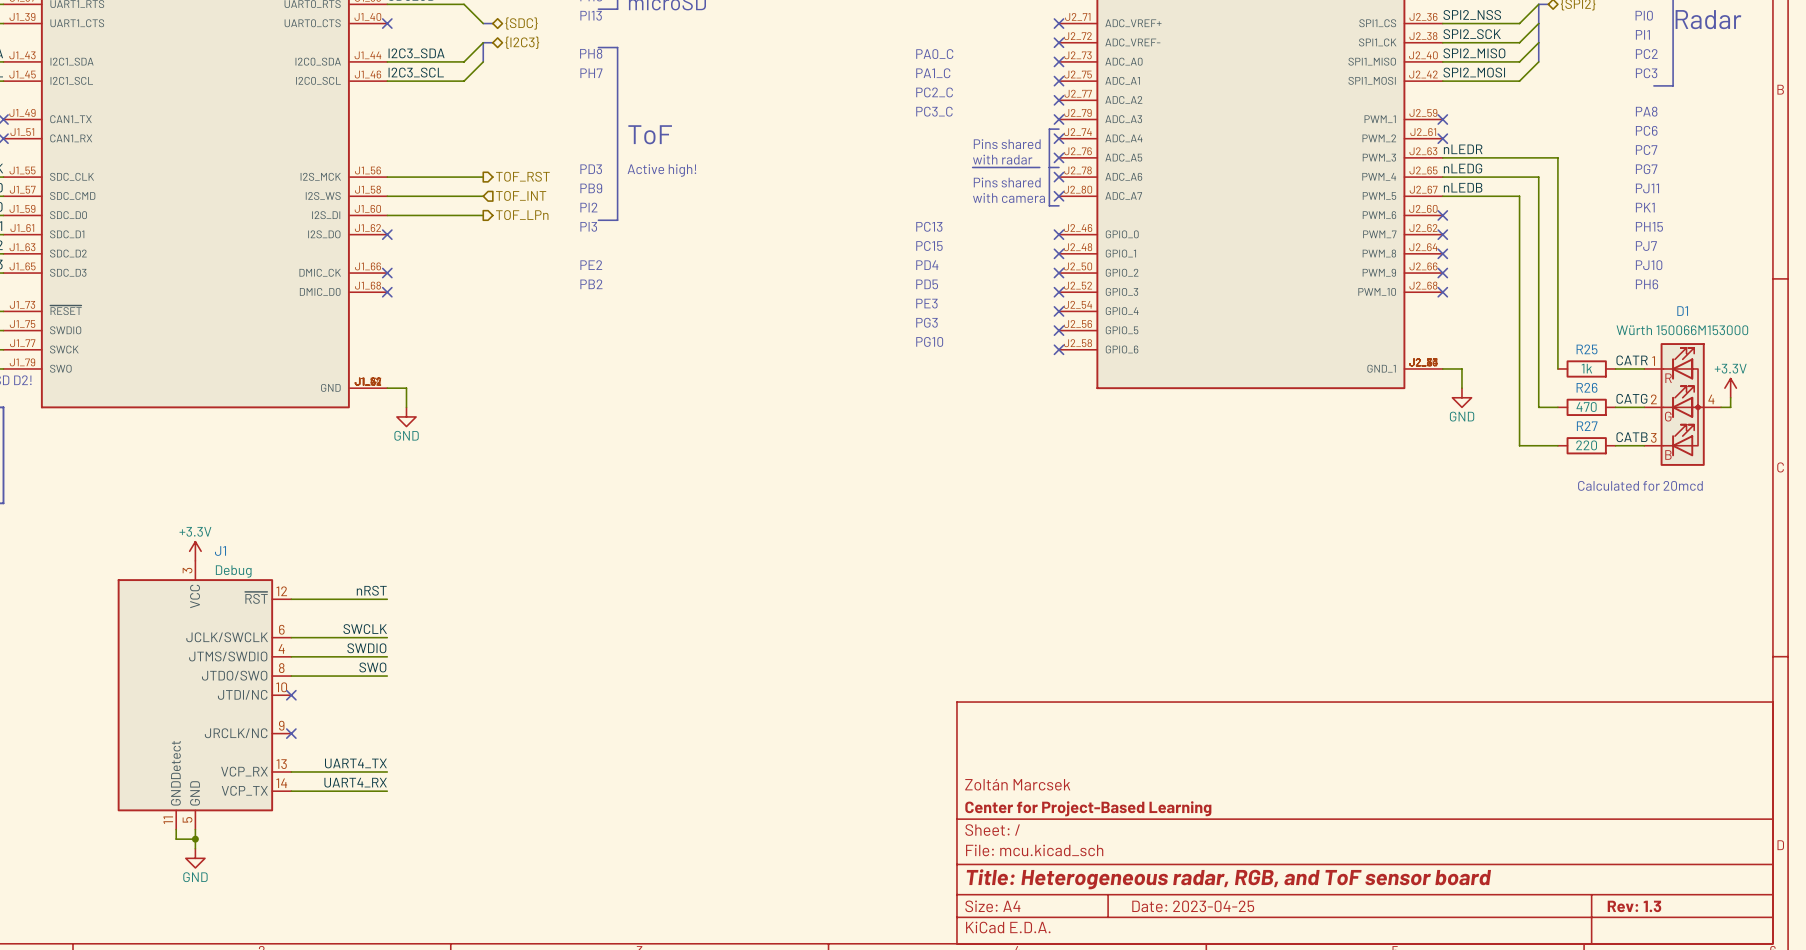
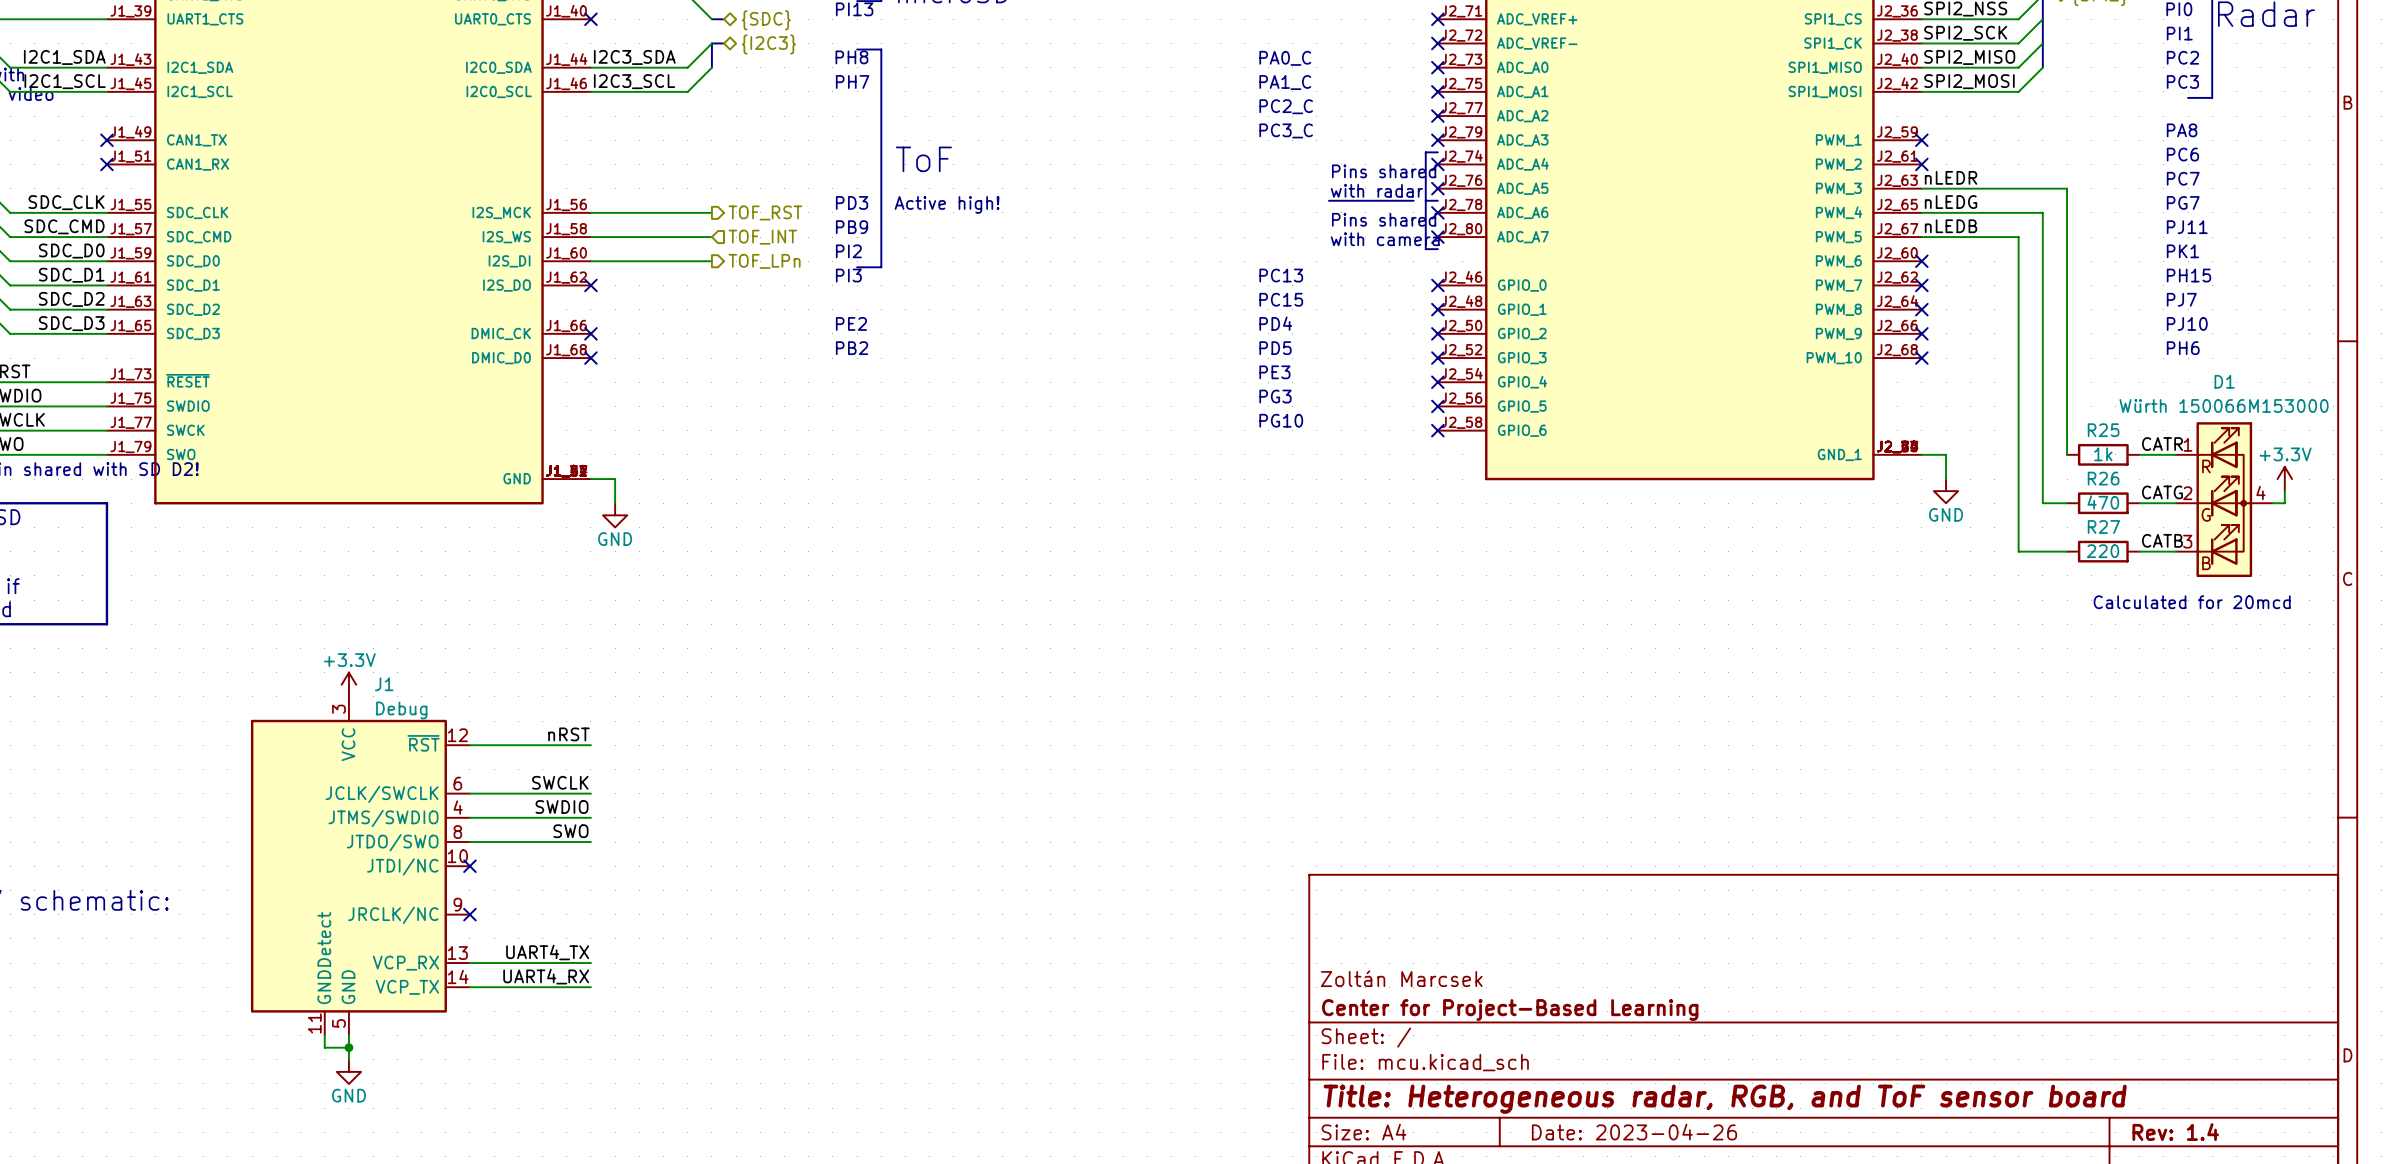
title block: Date: 2023-04-25 (1193, 906) -> Date: 2023-04-26 (1634, 1132)
title block: Rev: 1.3 (1634, 906) -> Rev: 1.4 (2175, 1132)

